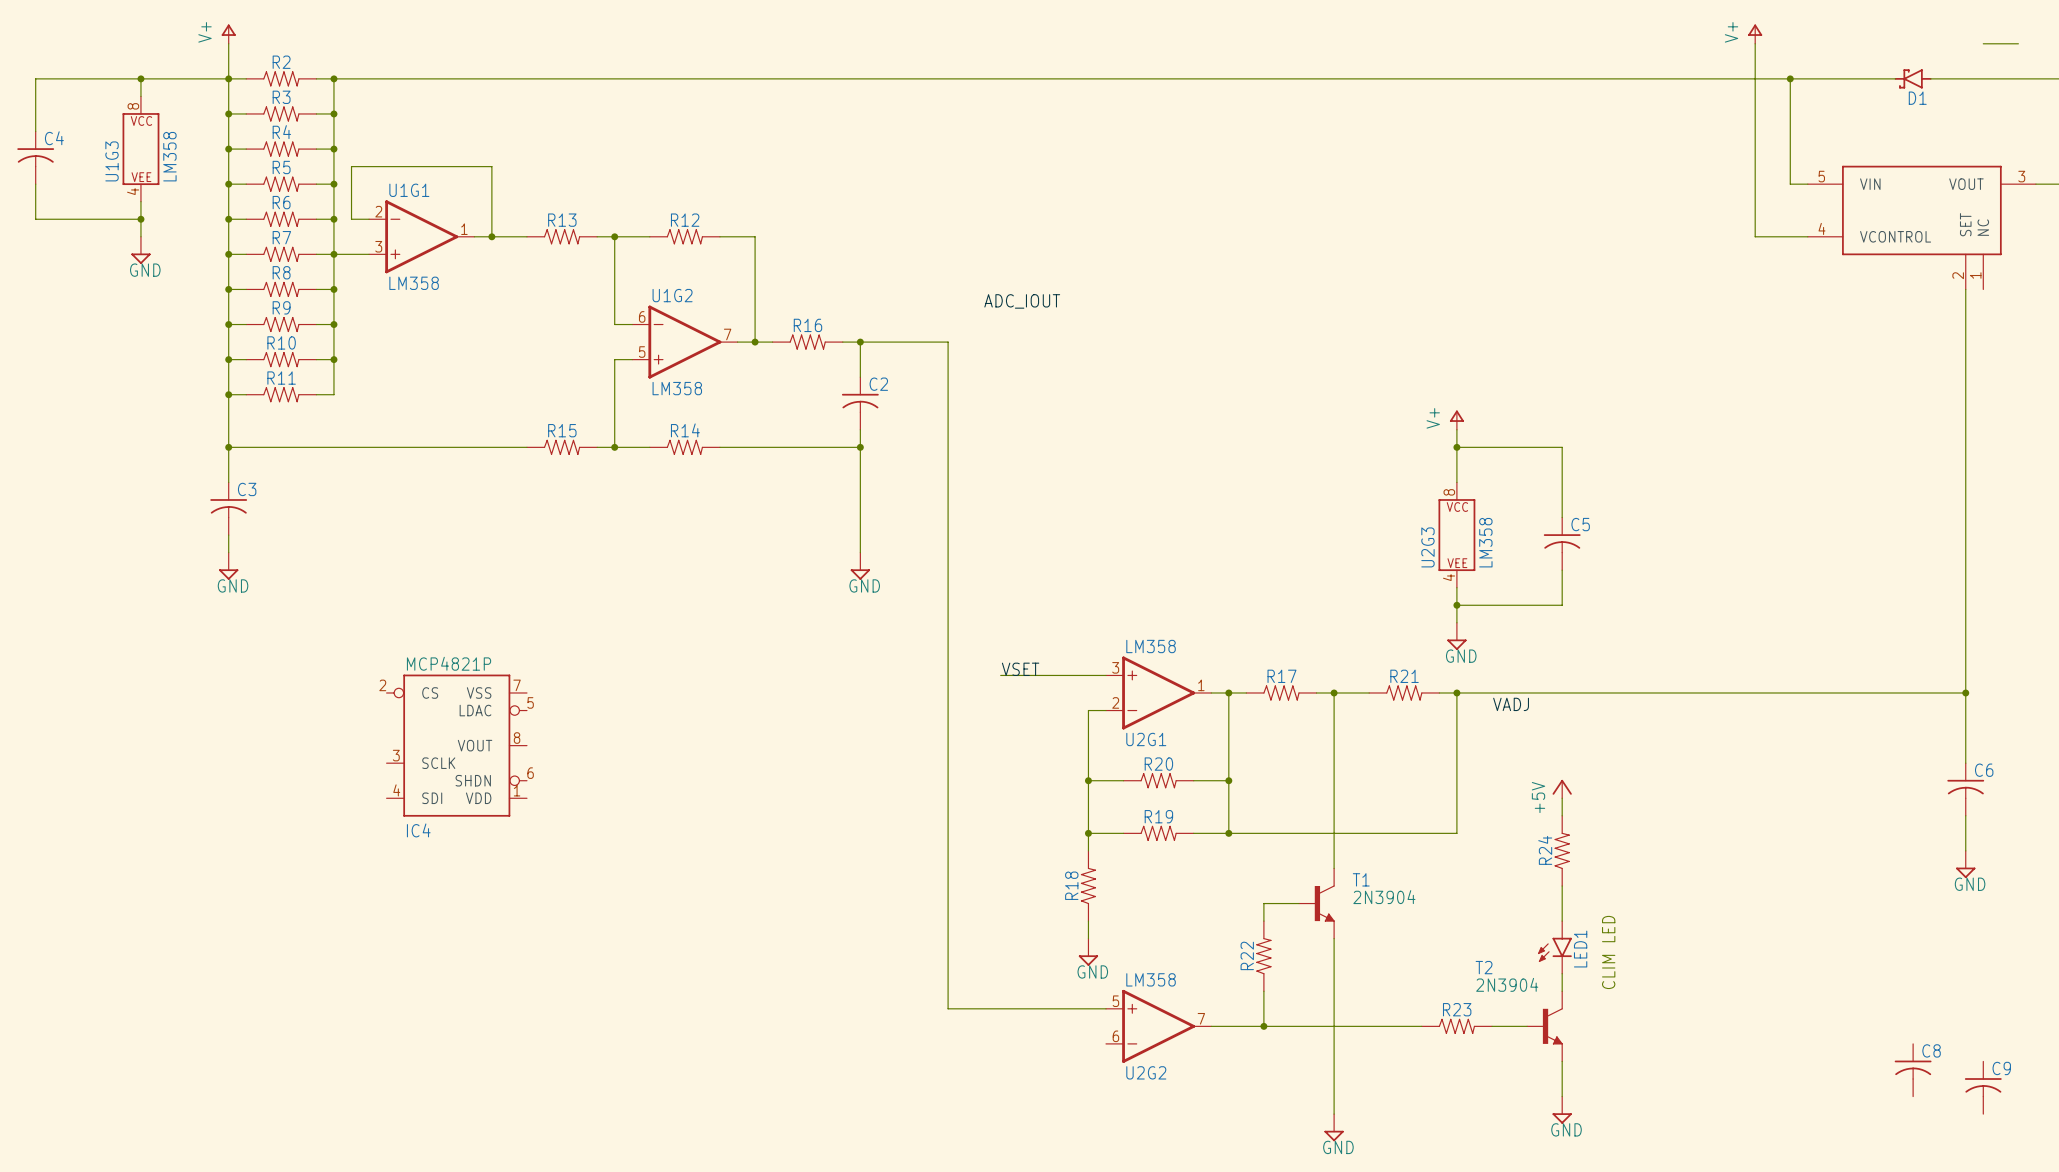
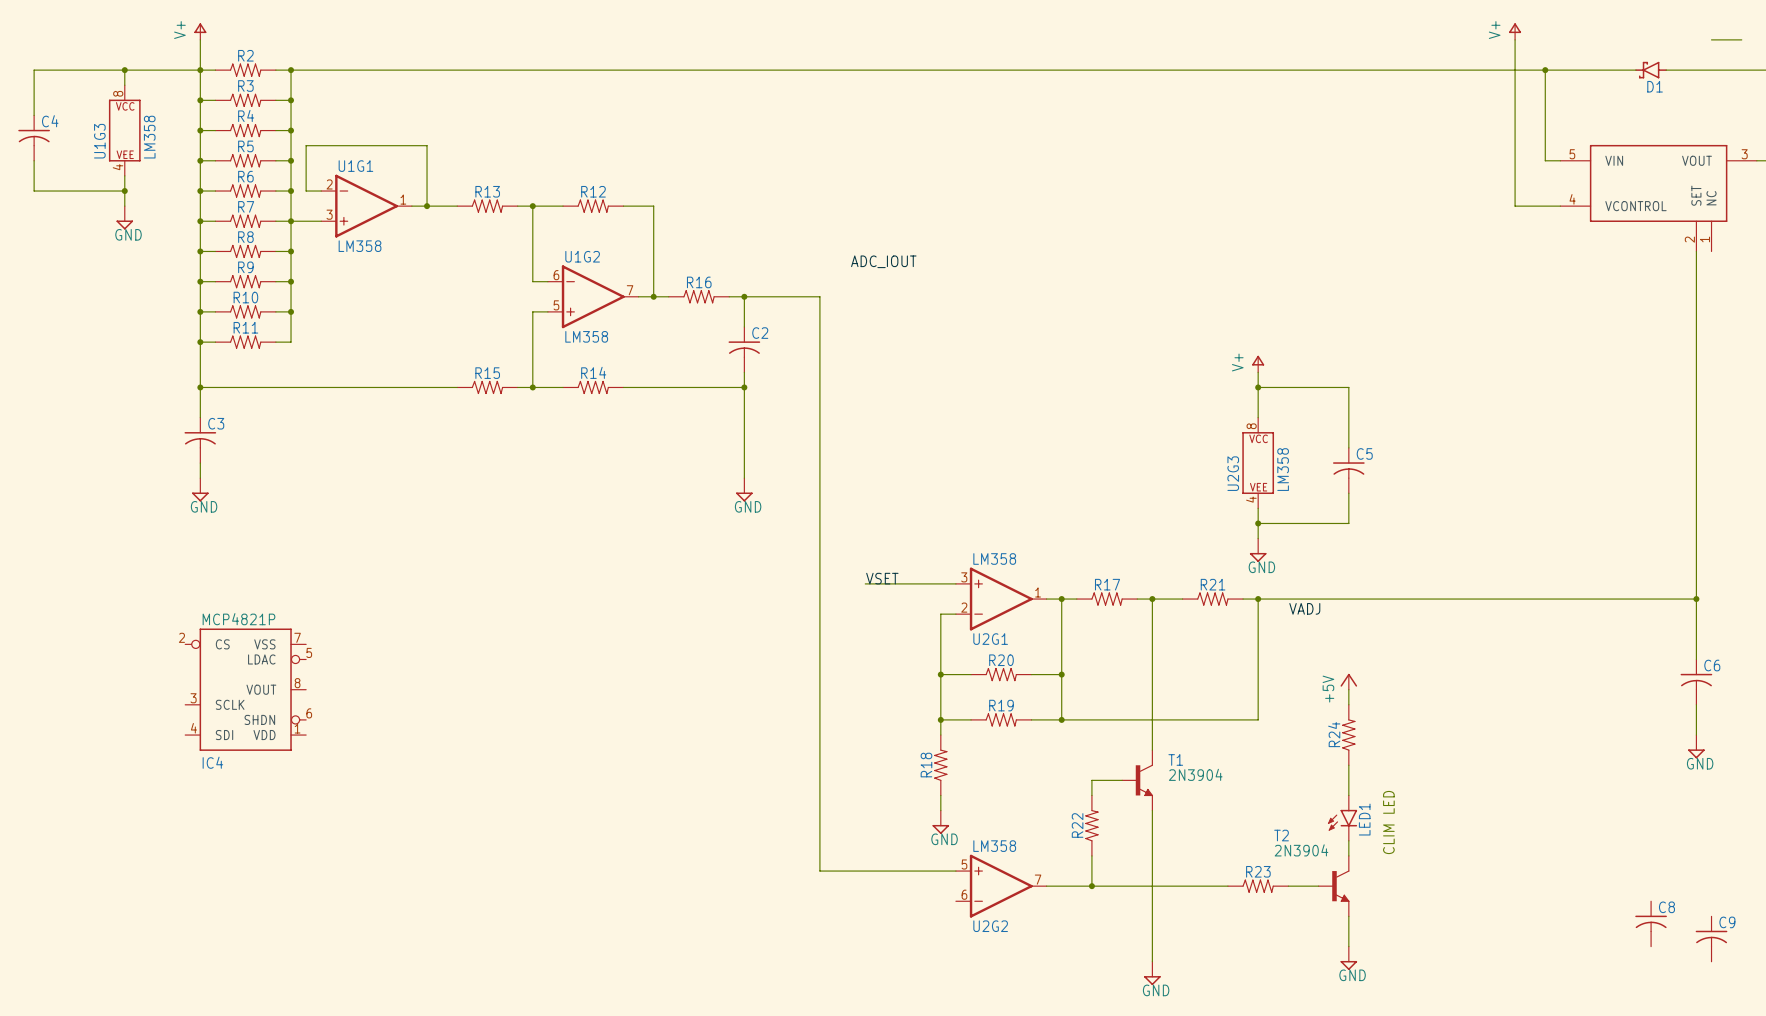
IC4 position: (456, 745) -> (245, 689)

